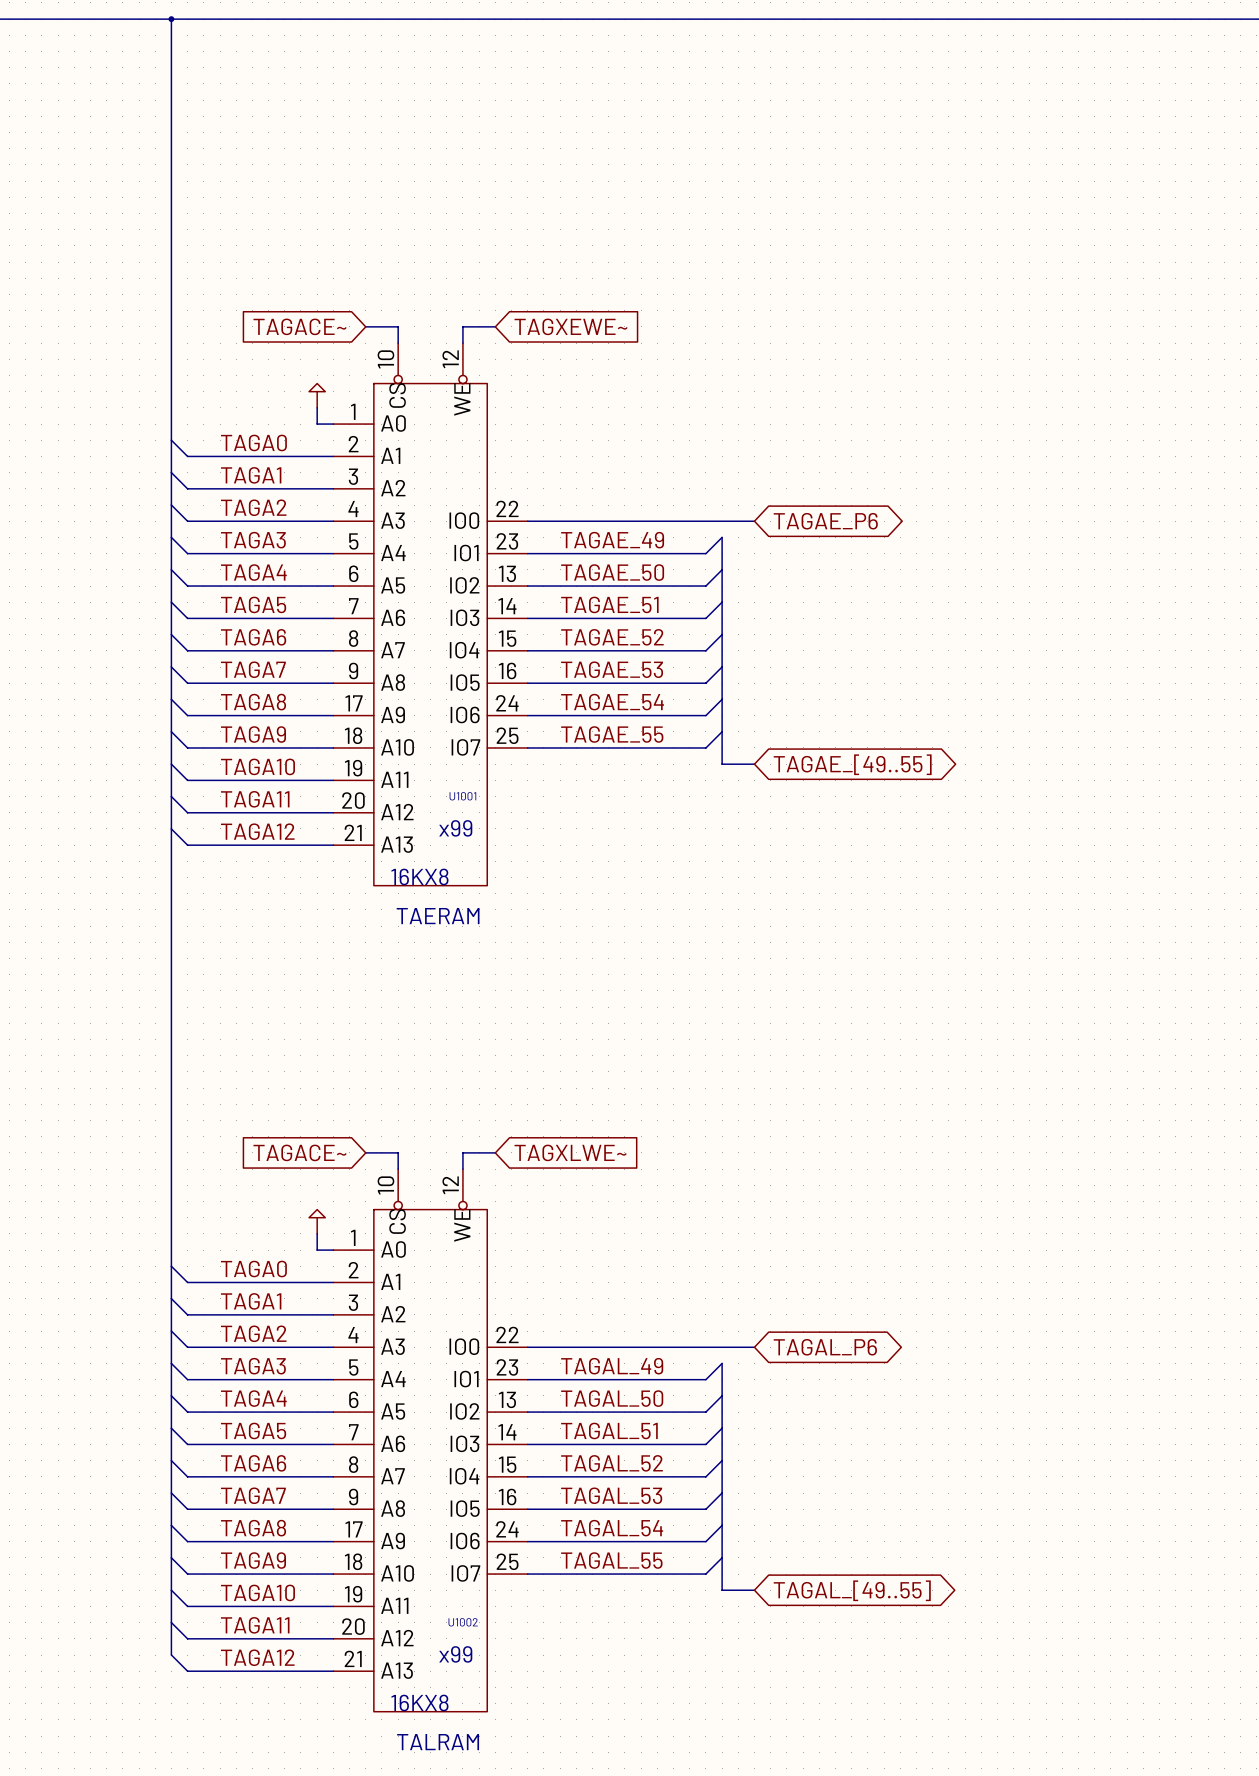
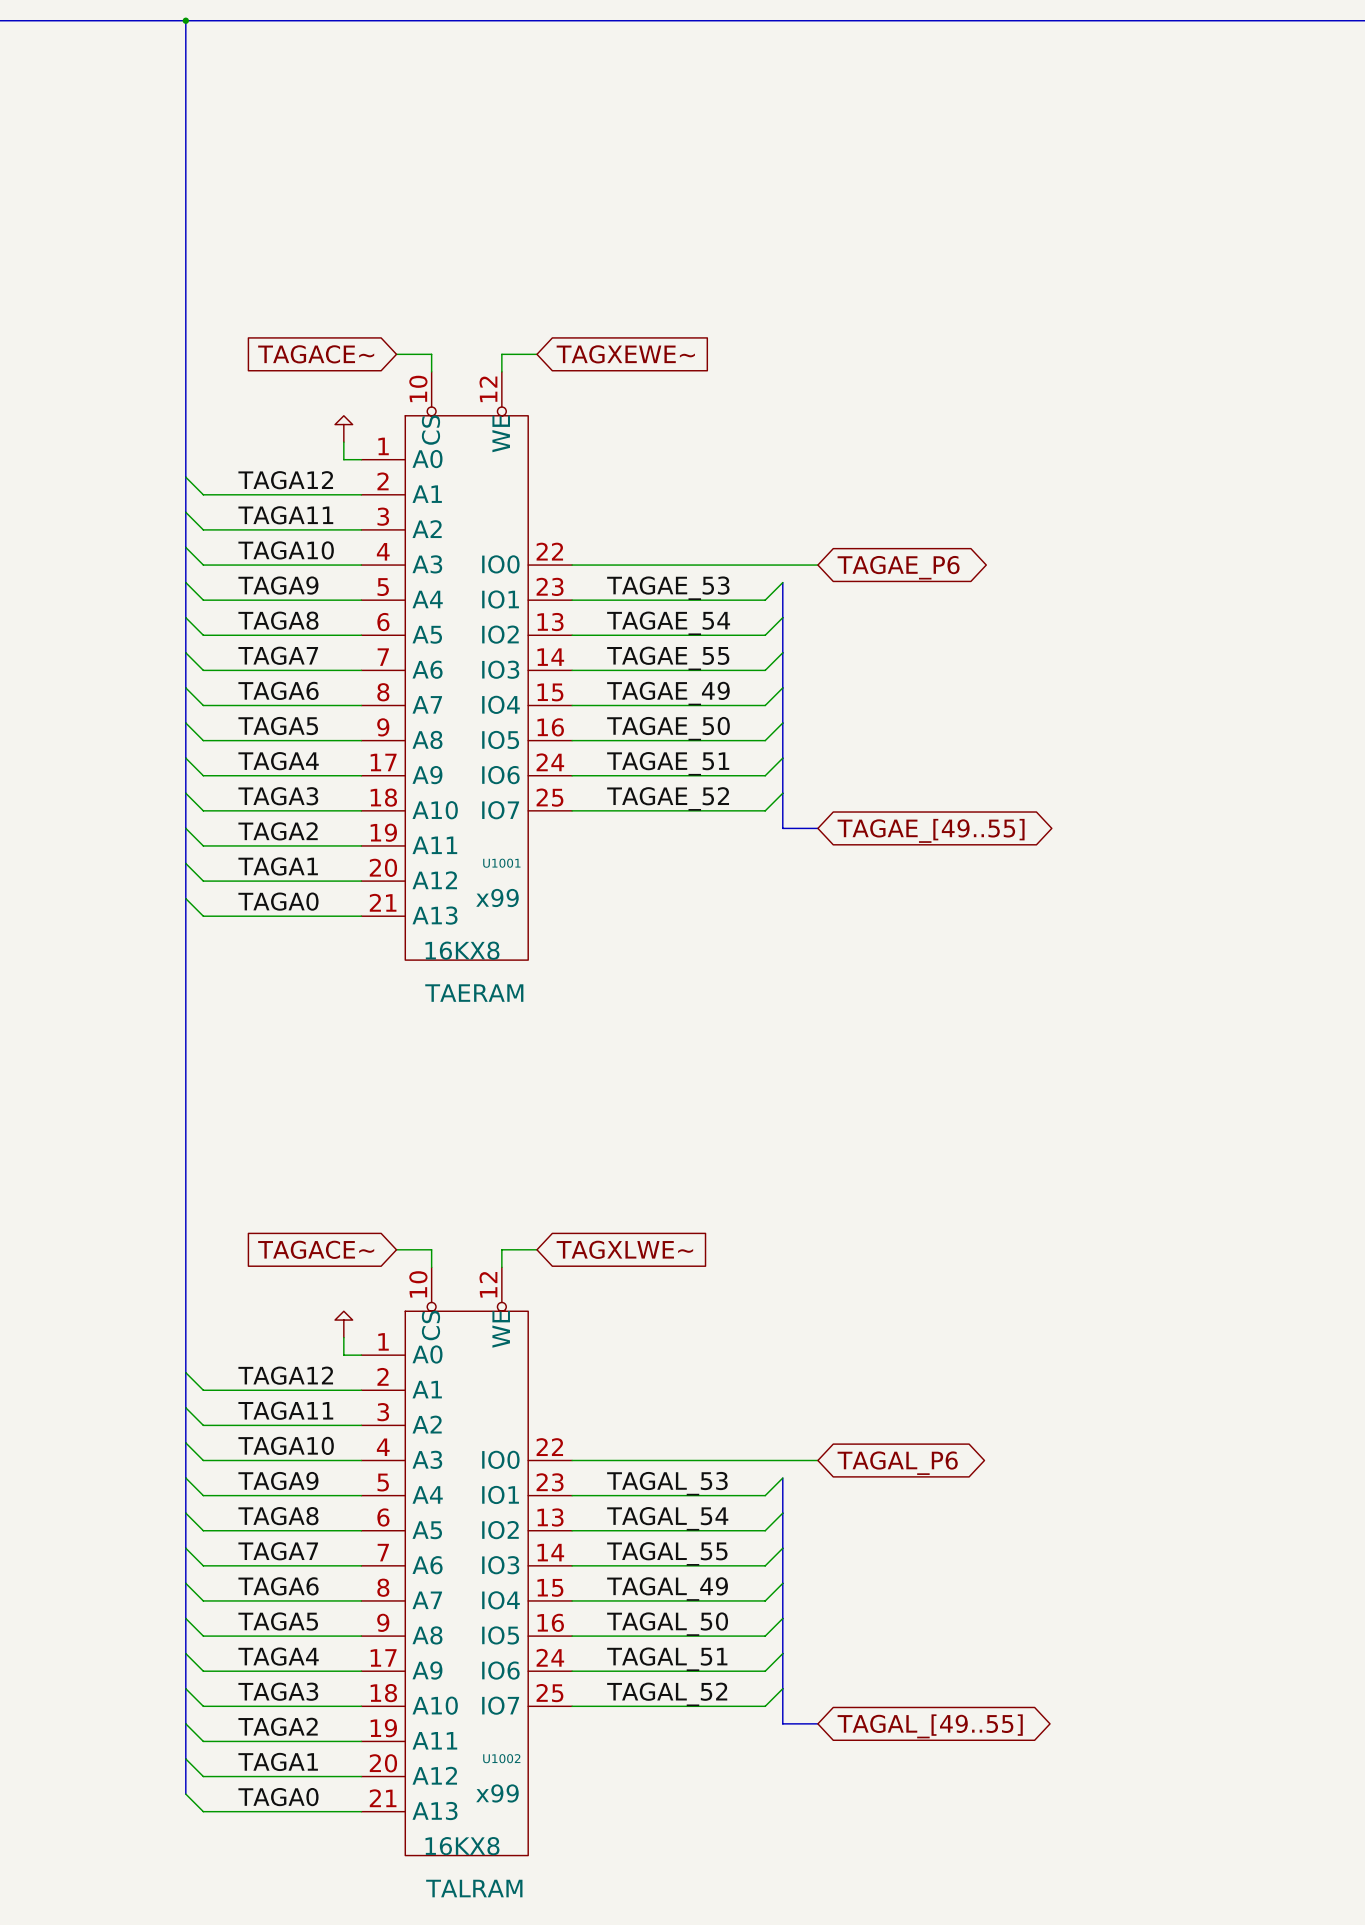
label: TAGA0 (253, 442) -> TAGA12 (285, 480)
label: TAGA1 (251, 475) -> TAGA11 (285, 515)
label: TAGA2 (253, 507) -> TAGA10 (286, 550)
label: TAGA3 (253, 540) -> TAGA9 (278, 585)
label: TAGAE_49 (612, 540) -> TAGAE_53 (668, 588)
label: TAGA4 (253, 572) -> TAGA8 (278, 620)
label: TAGAE_50 (612, 572) -> TAGAE_54 (668, 623)
label: TAGA5 (253, 604) -> TAGA7 (278, 655)
label: TAGAE_51 (609, 604) -> TAGAE_55 (668, 658)
label: TAGAE_52 (612, 637) -> TAGAE_49 (668, 693)
label: TAGA7 (253, 669) -> TAGA5 (278, 726)
label: TAGAE_53 (612, 669) -> TAGAE_50 (668, 728)
label: TAGA8 (253, 702) -> TAGA4 (278, 761)
label: TAGAE_54 (612, 702) -> TAGAE_51 (668, 763)
label: TAGA9 (253, 734) -> TAGA3 (278, 796)
label: TAGAE_55 (612, 734) -> TAGAE_52 (668, 798)
label: TAGA10 (257, 766) -> TAGA2 (278, 831)
label: TAGA11 (255, 799) -> TAGA1 (278, 866)
label: TAGA12 (257, 831) -> TAGA0 (278, 901)
label: TAGA0 (253, 1269) -> TAGA12 (285, 1375)
label: TAGA1 (251, 1301) -> TAGA11 (285, 1410)
label: TAGA2 (253, 1333) -> TAGA10 (286, 1445)
label: TAGA3 (253, 1366) -> TAGA9 (278, 1481)
label: TAGAL_49 (612, 1366) -> TAGAL_53 (667, 1483)
label: TAGA4 (253, 1398) -> TAGA8 (278, 1516)
label: TAGAL_50 (612, 1398) -> TAGAL_54 (667, 1518)
label: TAGA5 (253, 1430) -> TAGA7 (278, 1551)
label: TAGAL_51 (609, 1430) -> TAGAL_55 (667, 1553)
label: TAGAL_52 (612, 1463) -> TAGAL_49 (667, 1589)
label: TAGA7 (253, 1495) -> TAGA5 (278, 1621)
label: TAGAL_53 (611, 1495) -> TAGAL_50 (667, 1624)
label: TAGA8 (253, 1528) -> TAGA4 (278, 1656)
label: TAGAL_54 (612, 1528) -> TAGAL_51 (667, 1659)
label: TAGA9 (253, 1560) -> TAGA3 (278, 1691)
label: TAGAL_55 (611, 1560) -> TAGAL_52 (667, 1694)
label: TAGA10 (257, 1592) -> TAGA2 (278, 1726)
label: TAGA11 (255, 1625) -> TAGA1 (278, 1761)
label: TAGA12 (257, 1657) -> TAGA0 (278, 1797)

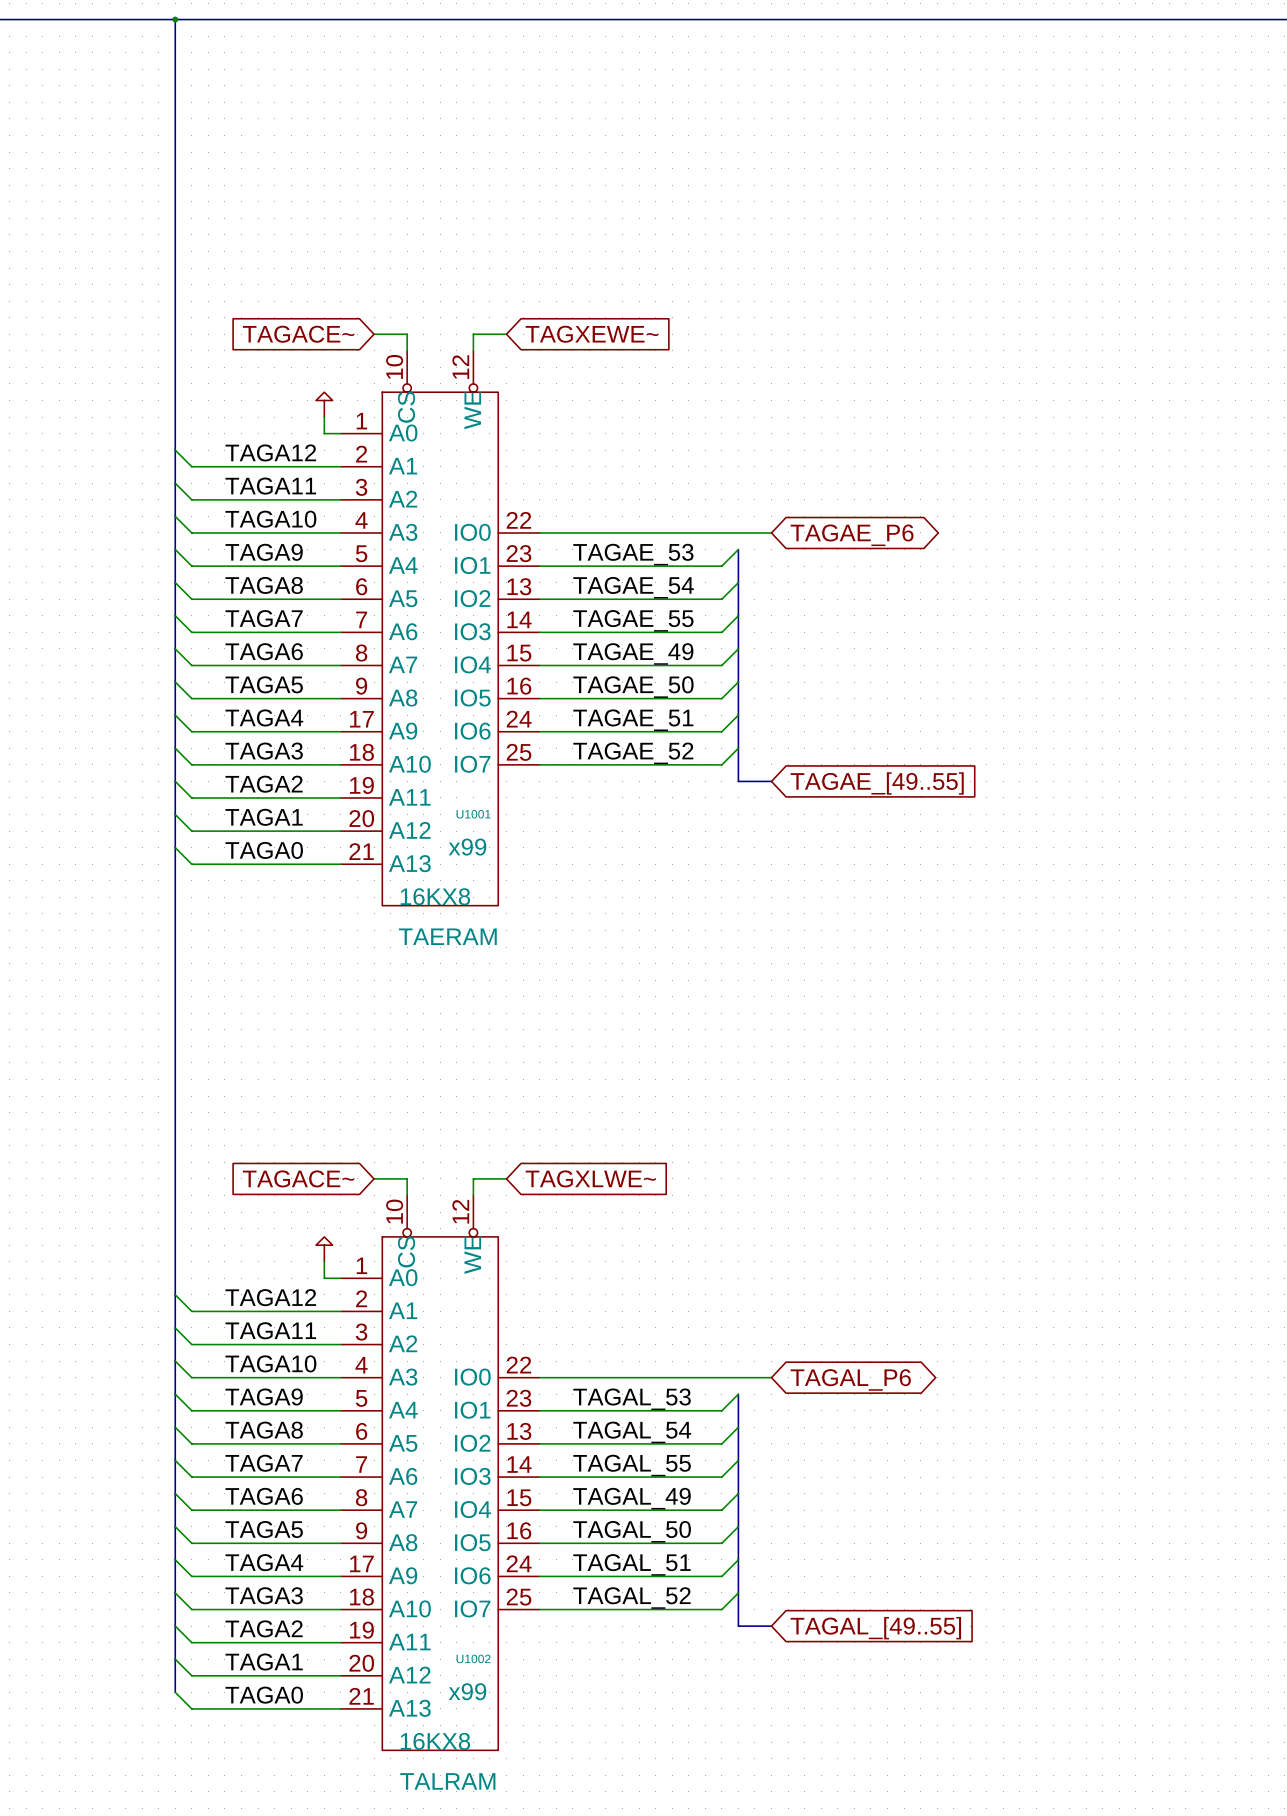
global label shape: bidirectional (931, 830) -> input (877, 783)
global label shape: bidirectional (930, 1726) -> input (875, 1628)

